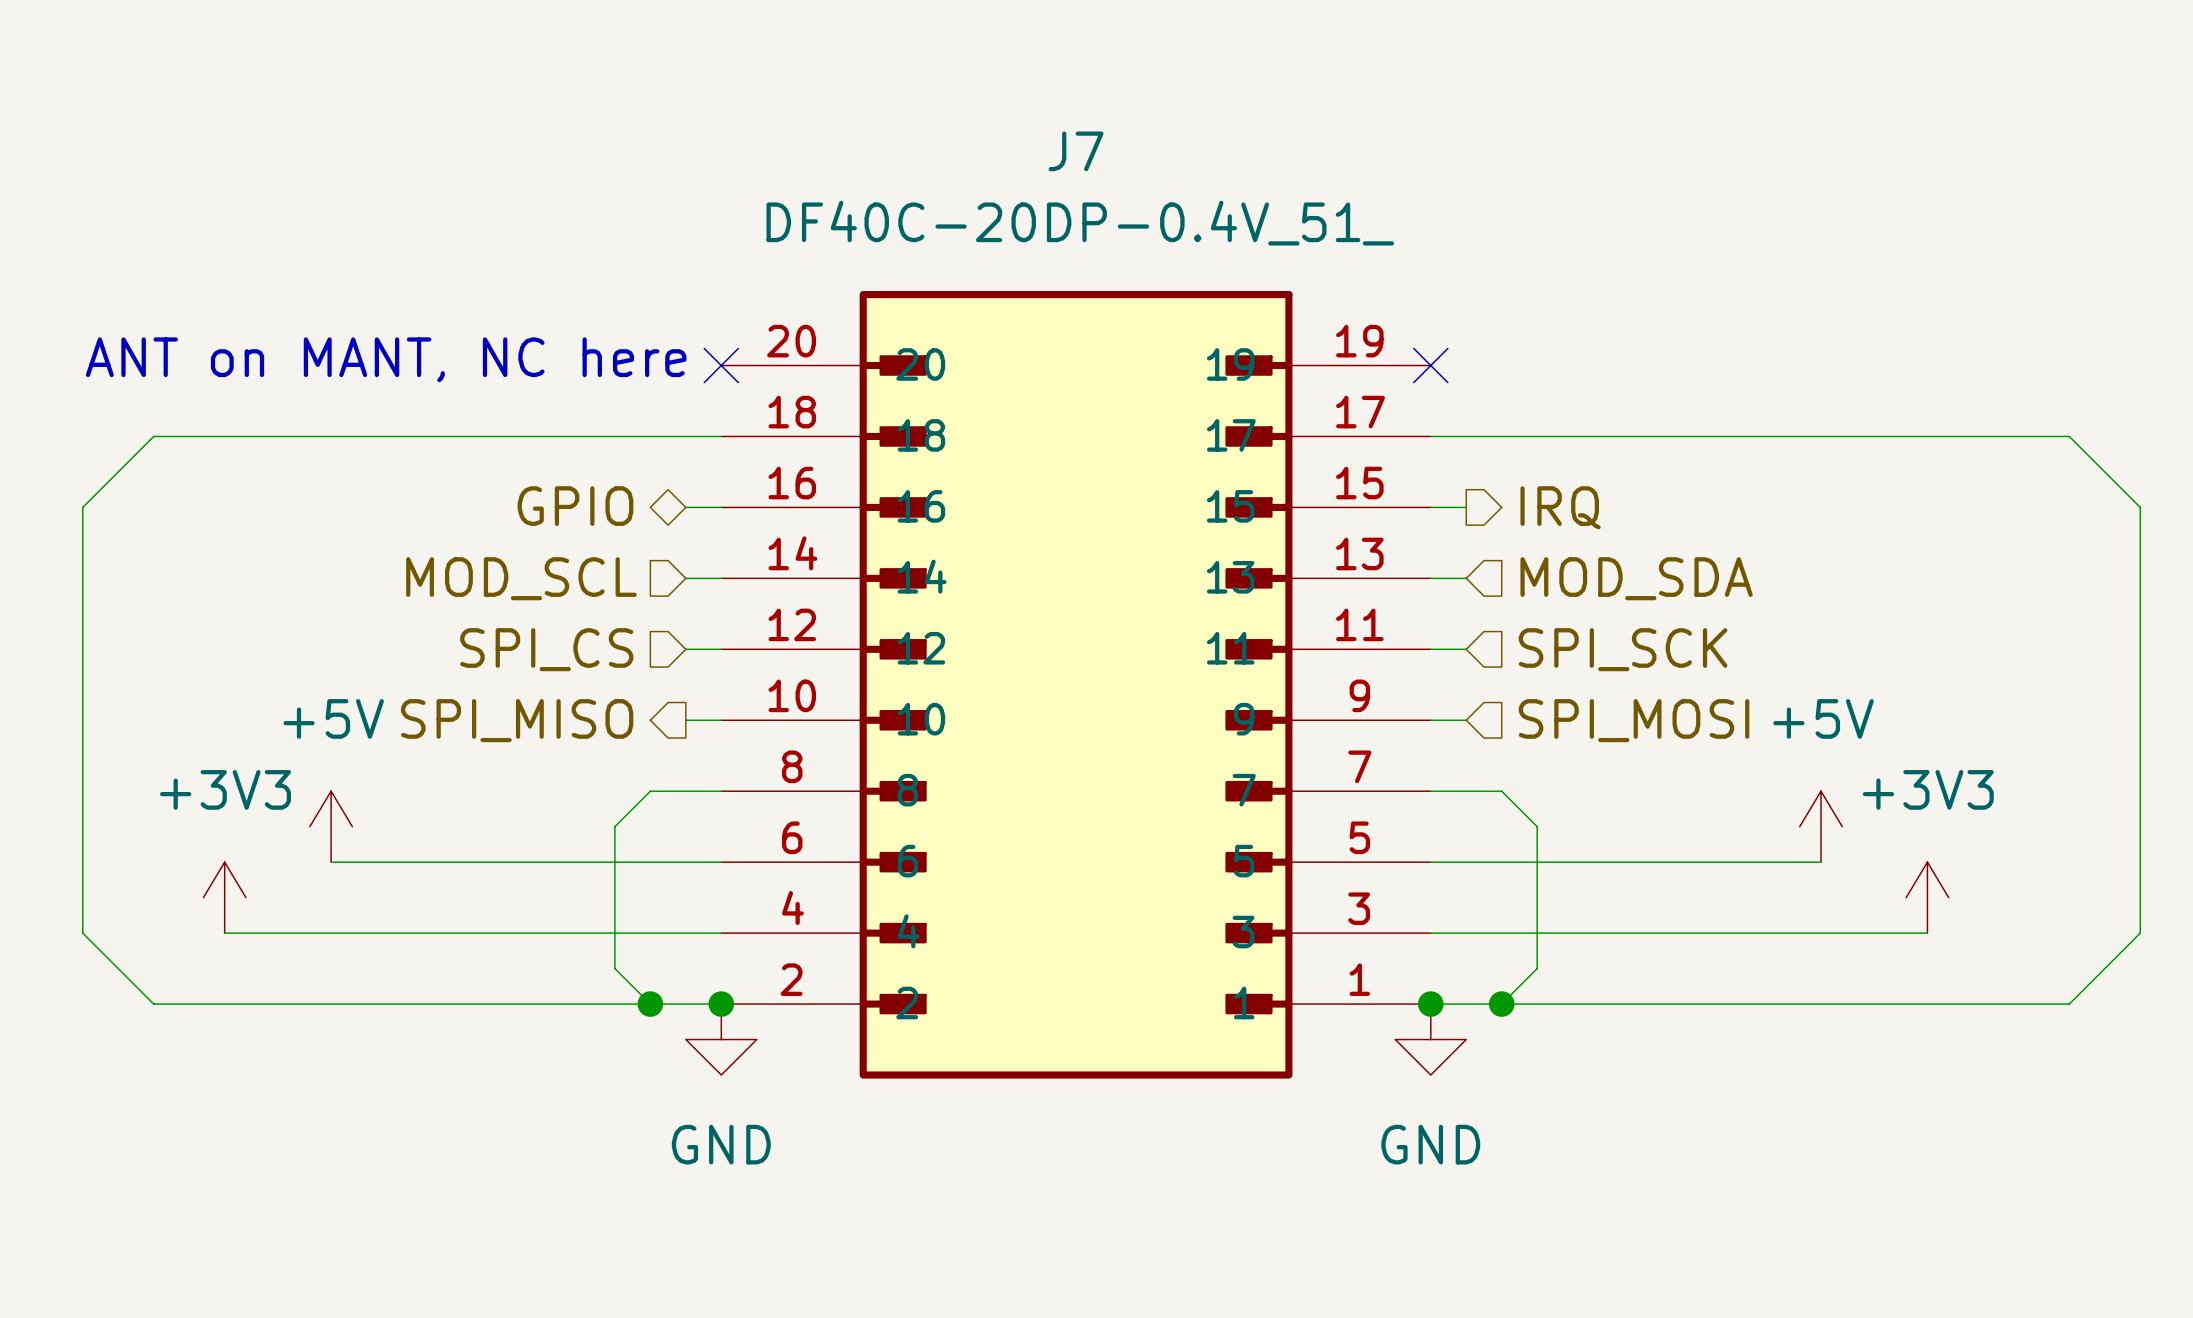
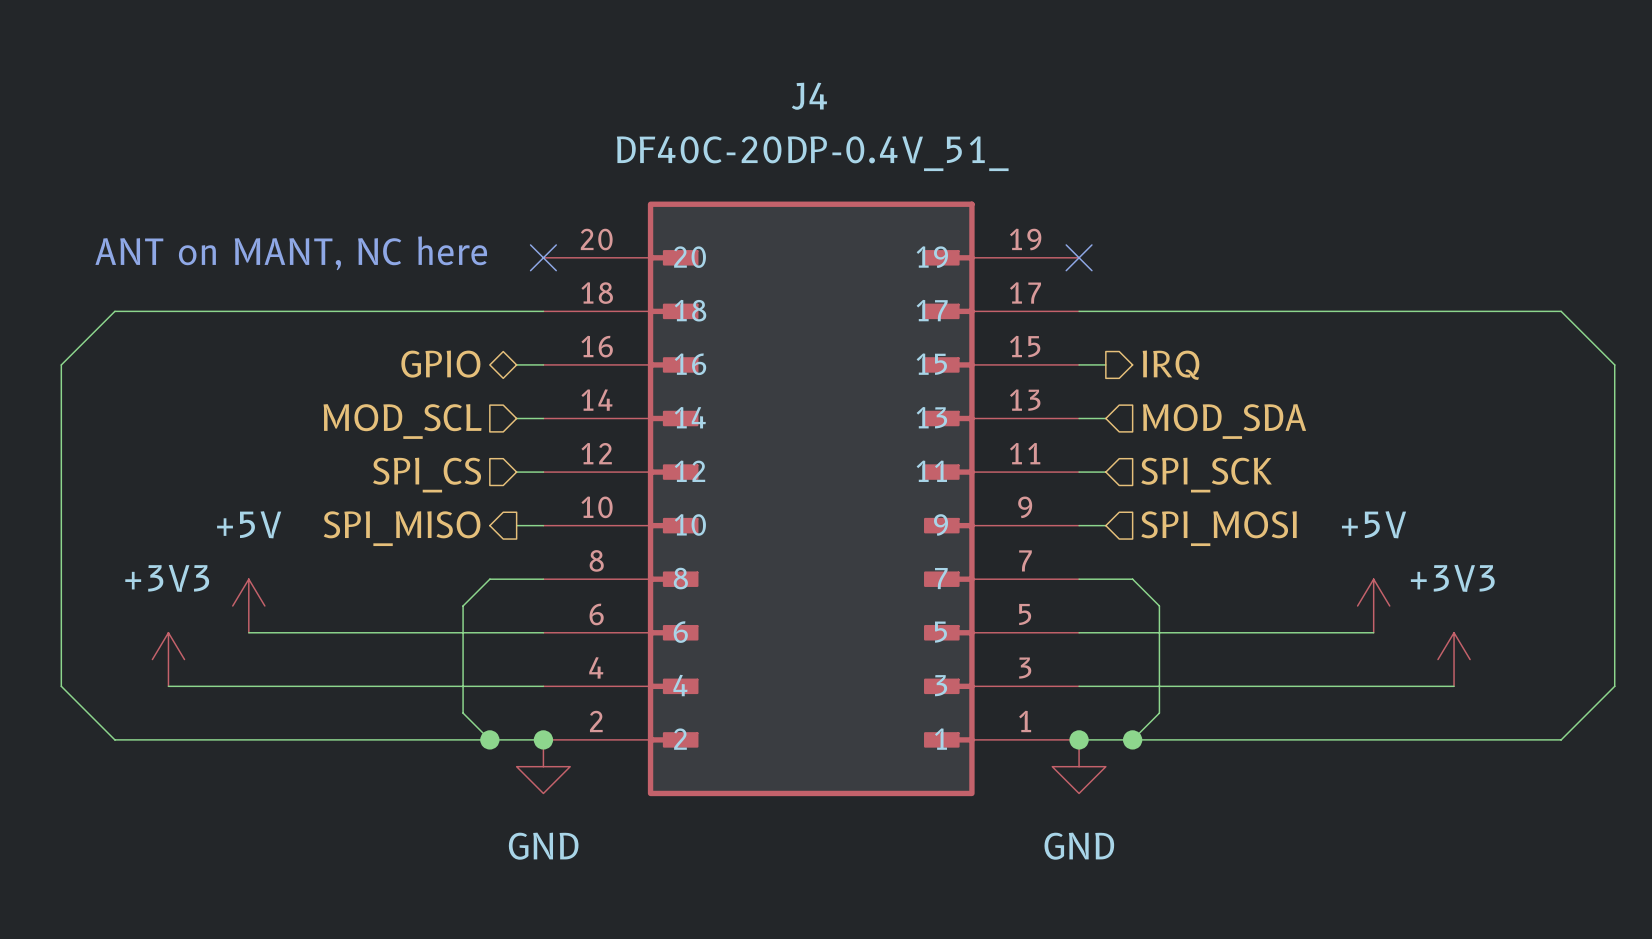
J7 name: J7 (1076, 151) -> J4 (809, 96)

